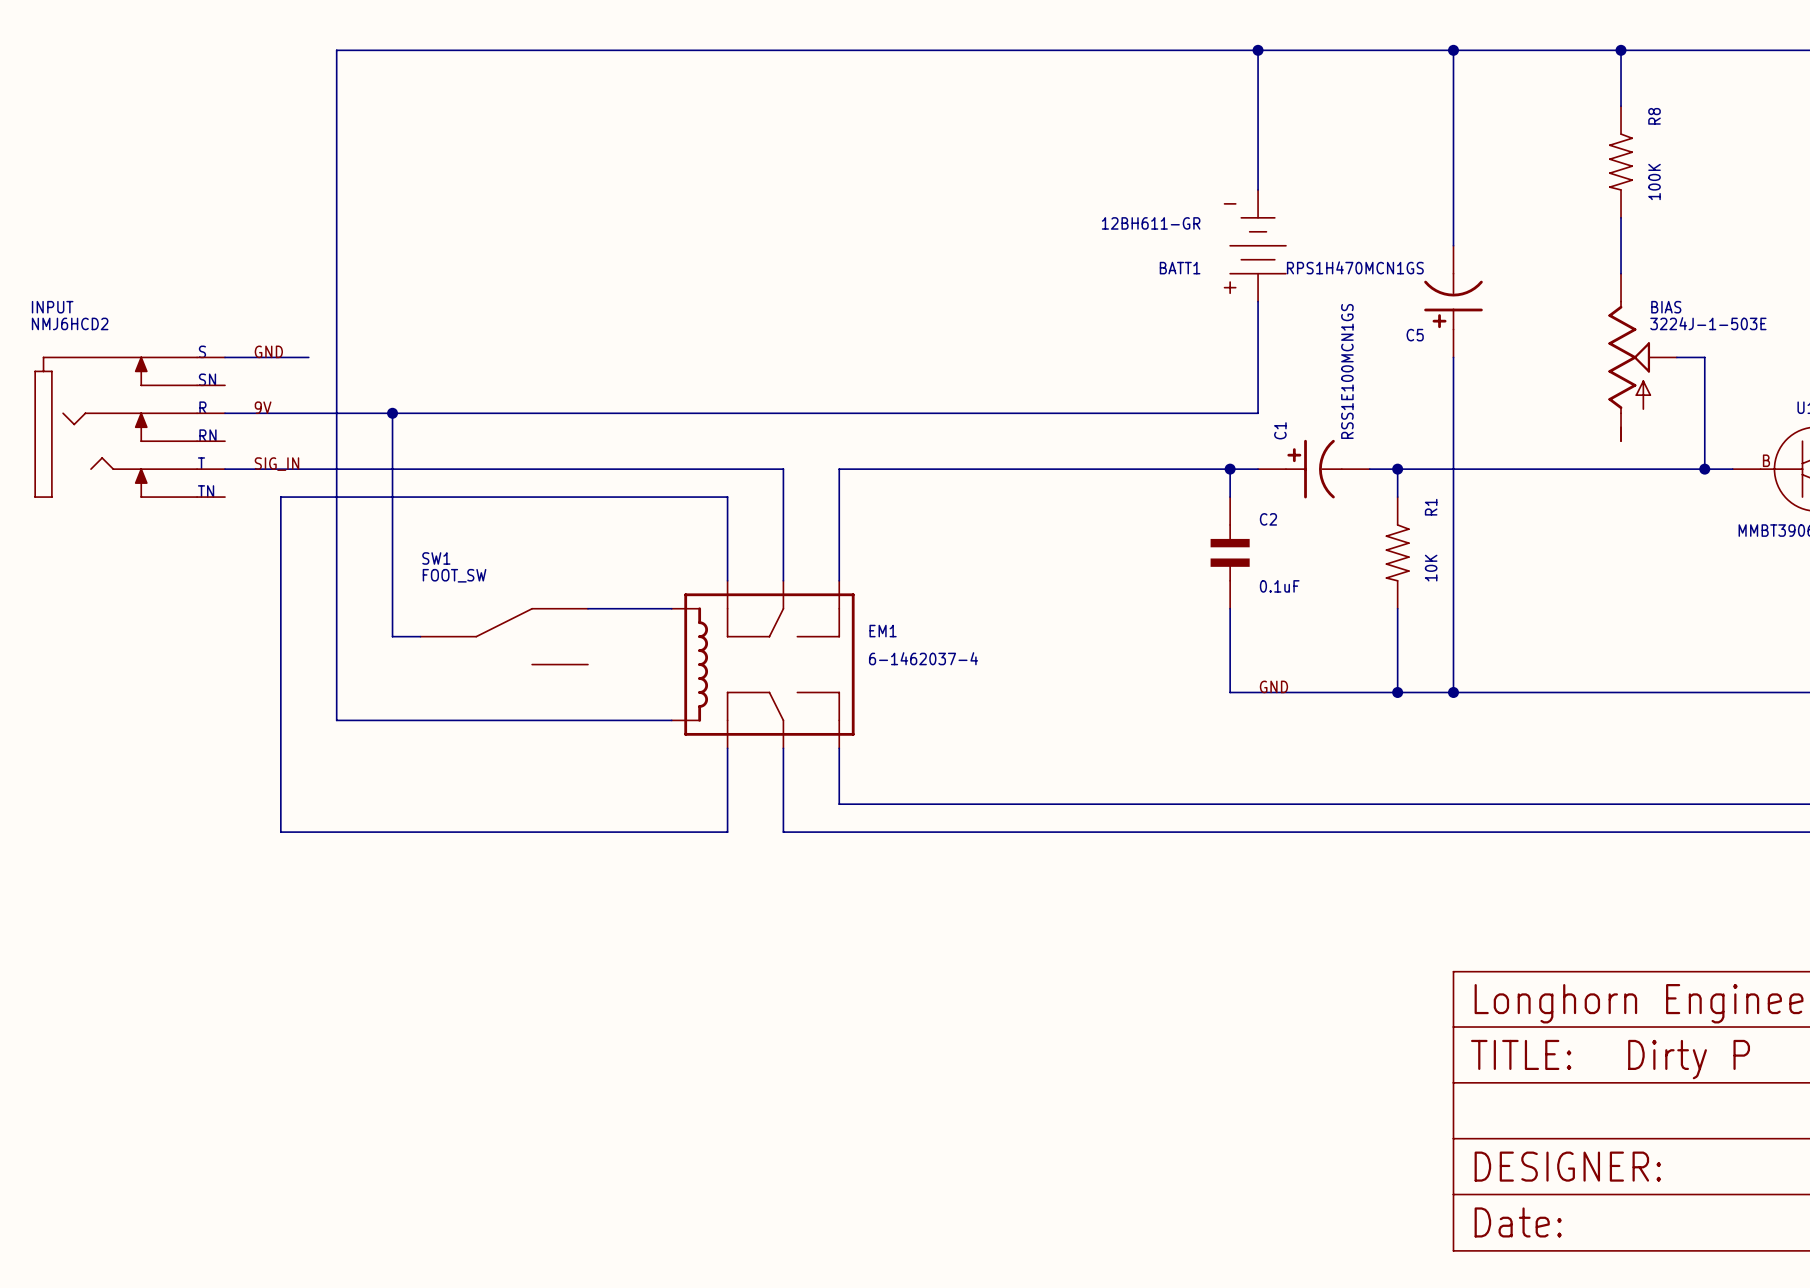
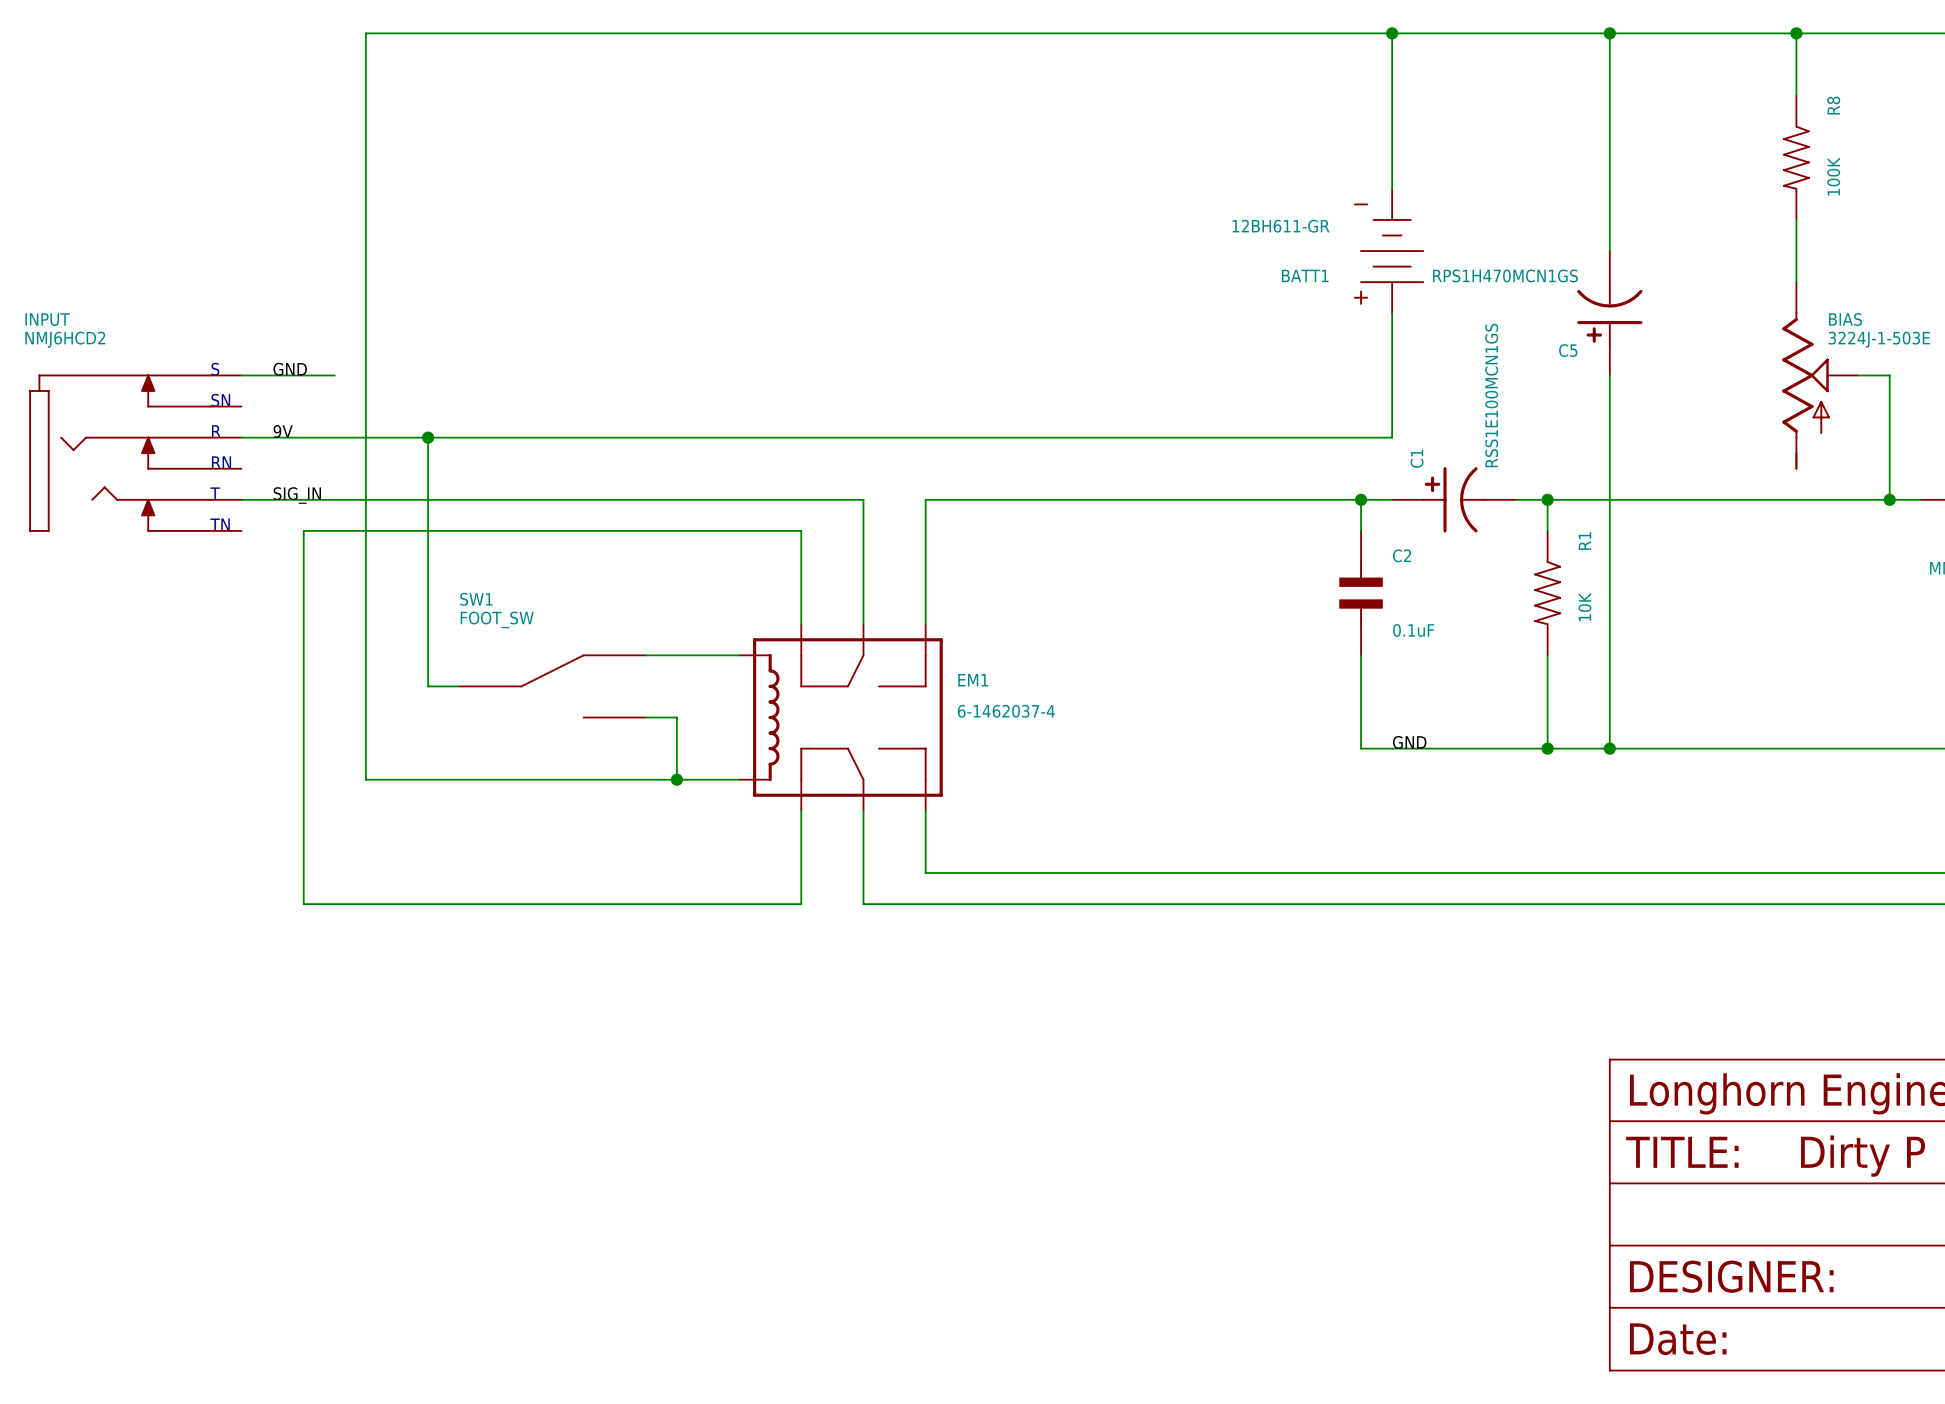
wire: none -> (645, 717) (676, 717) (676, 779)
junction: none -> (676, 779)

